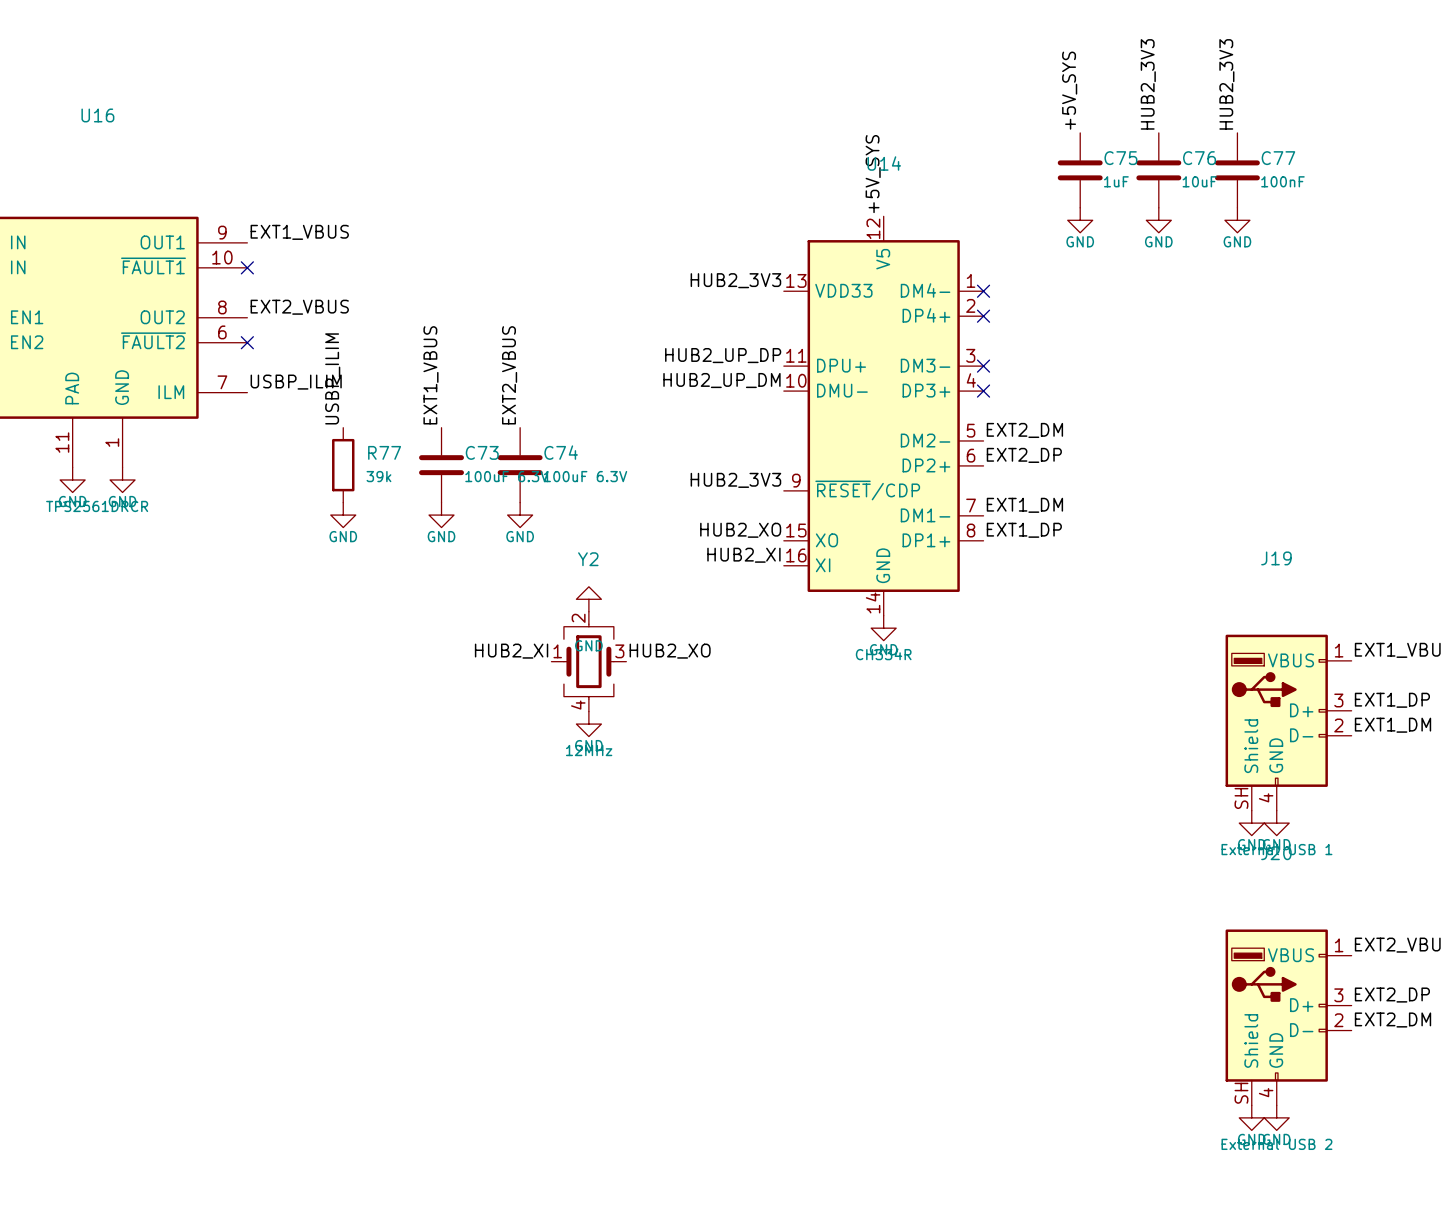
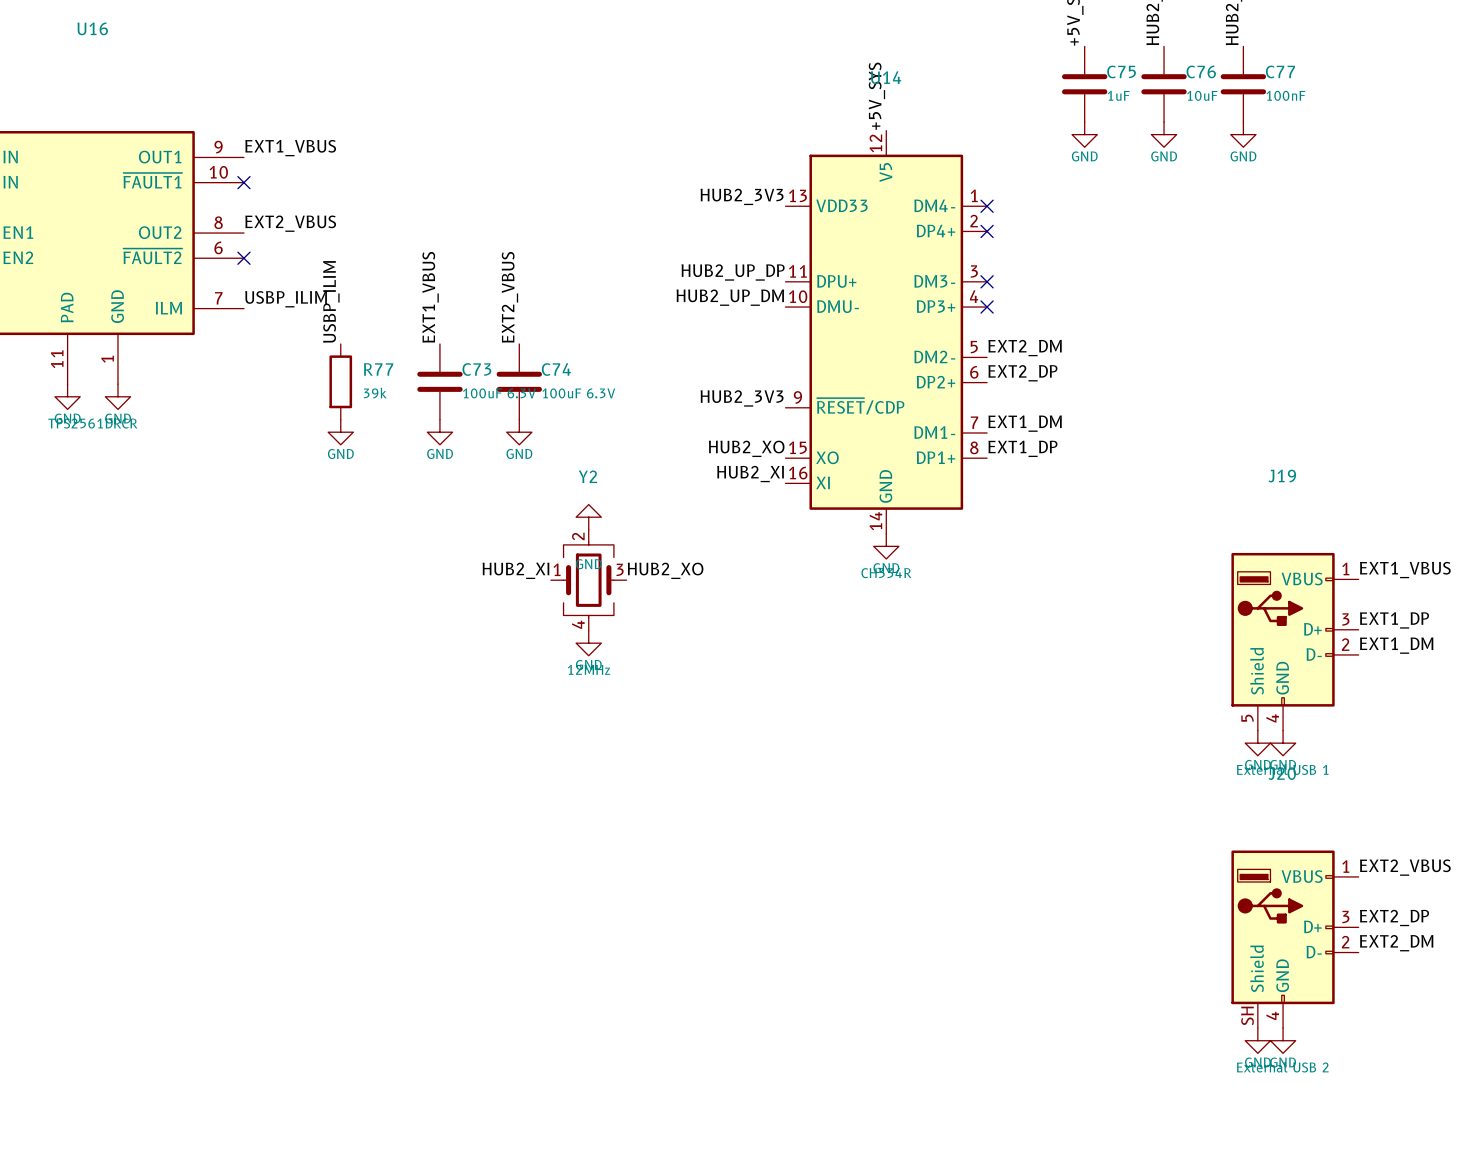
J19 pin number: SH (1241, 798) -> 5 (1247, 718)

